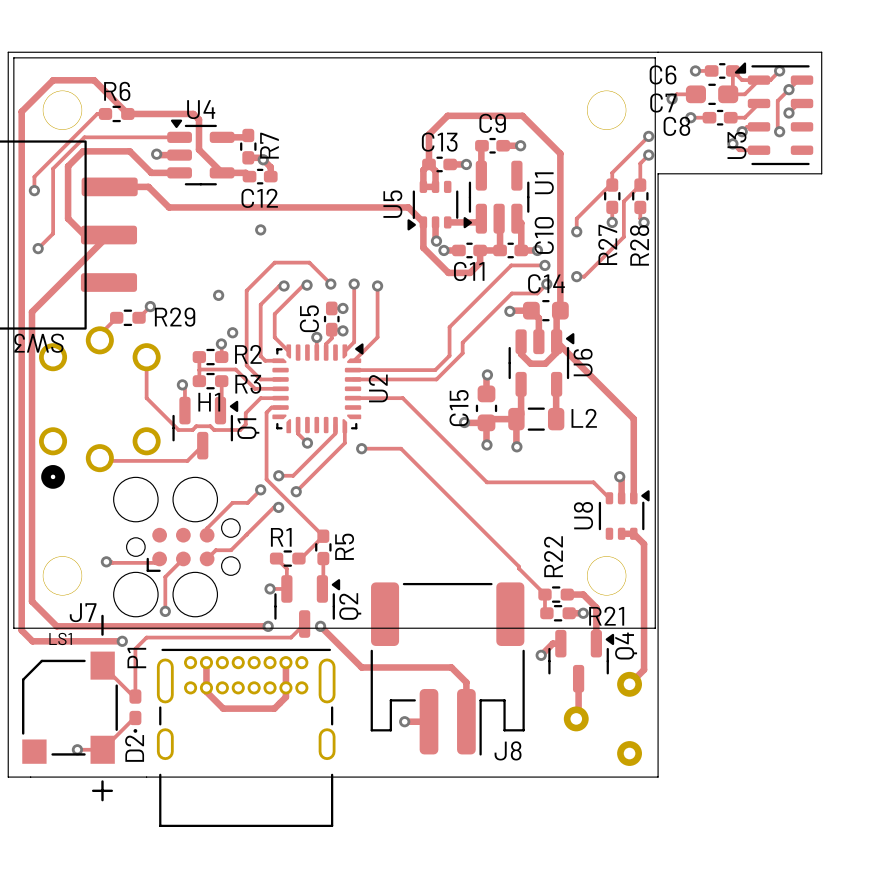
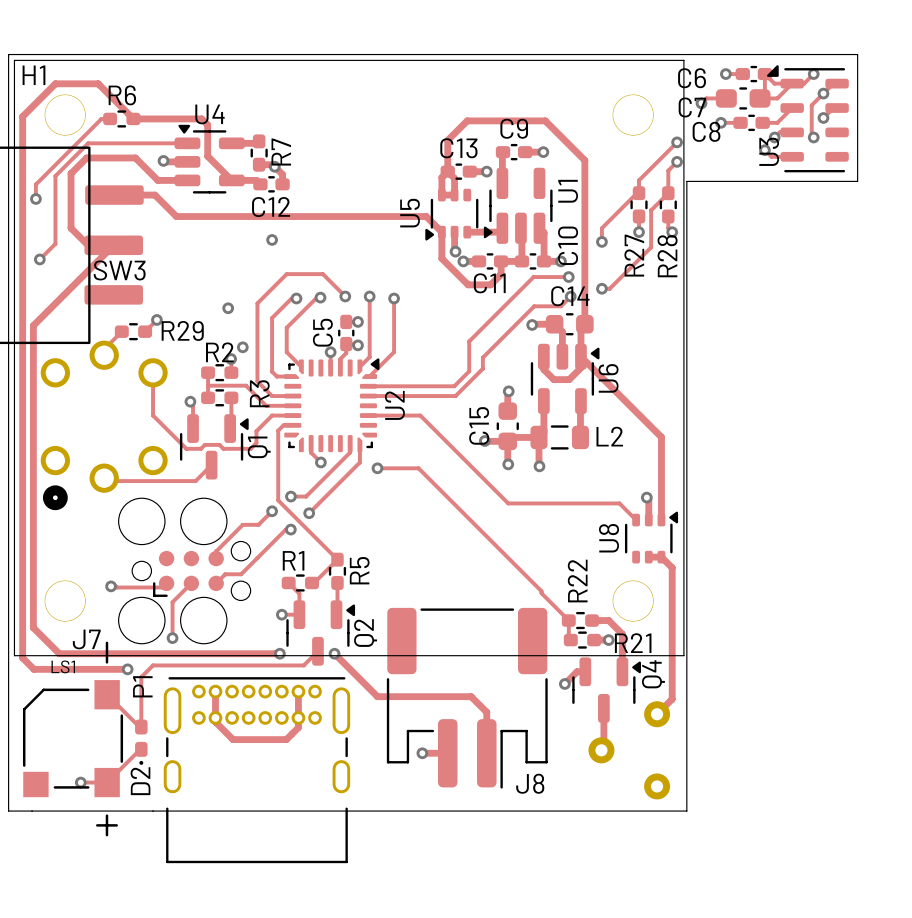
SW3 name rotation: 0° (39, 343) -> 180° (119, 270)
SW3 name position: SW3 (39, 343) -> SW3 (119, 270)
R2 name position: R2 (248, 354) -> R2 (219, 352)
R3 name rotation: 0° (248, 384) -> 90° counterclockwise (259, 393)
H1 name position: H1 (209, 402) -> H1 (33, 75)

